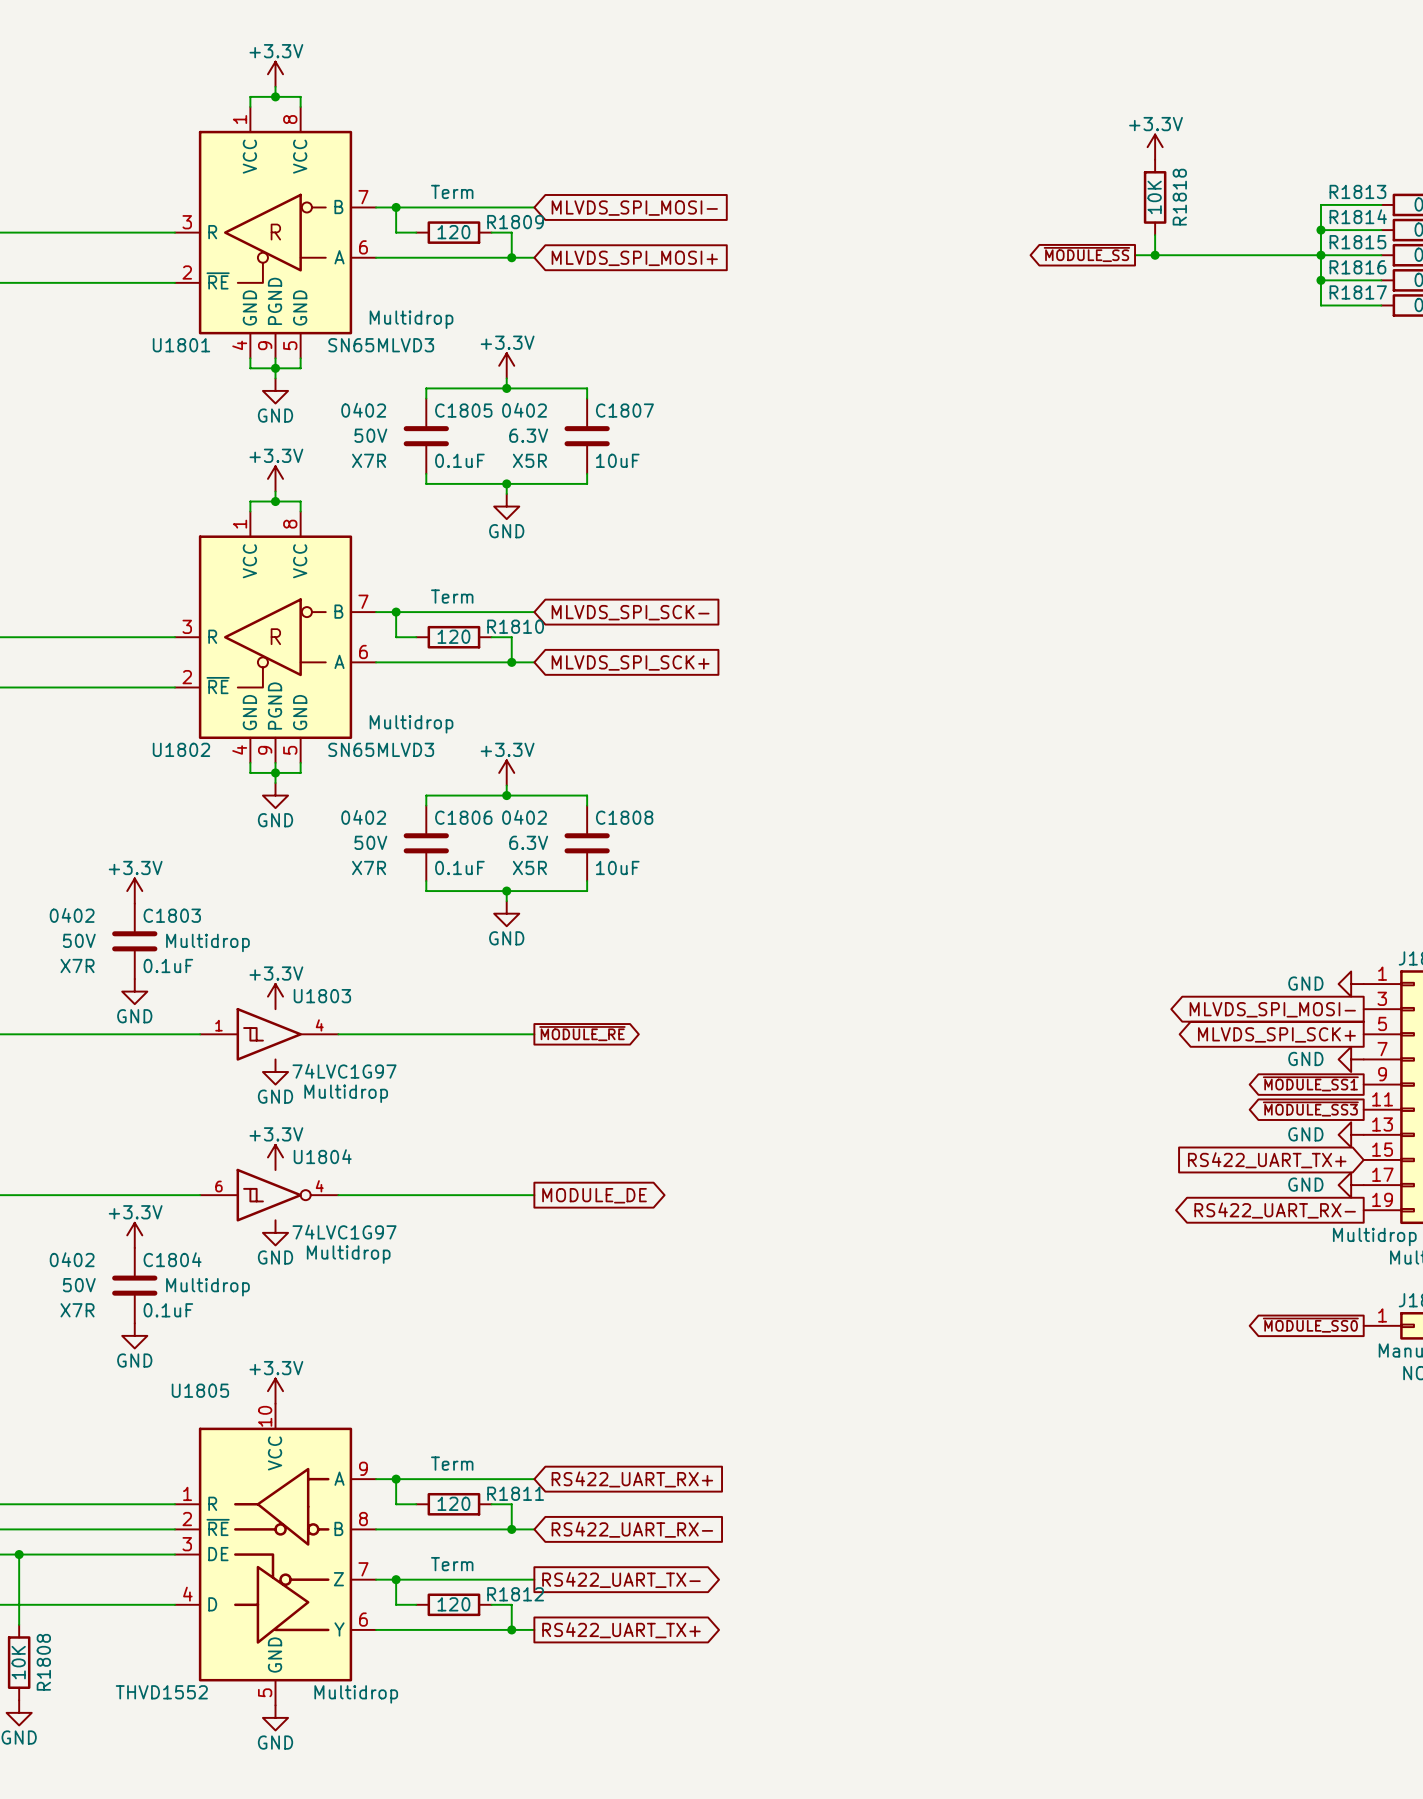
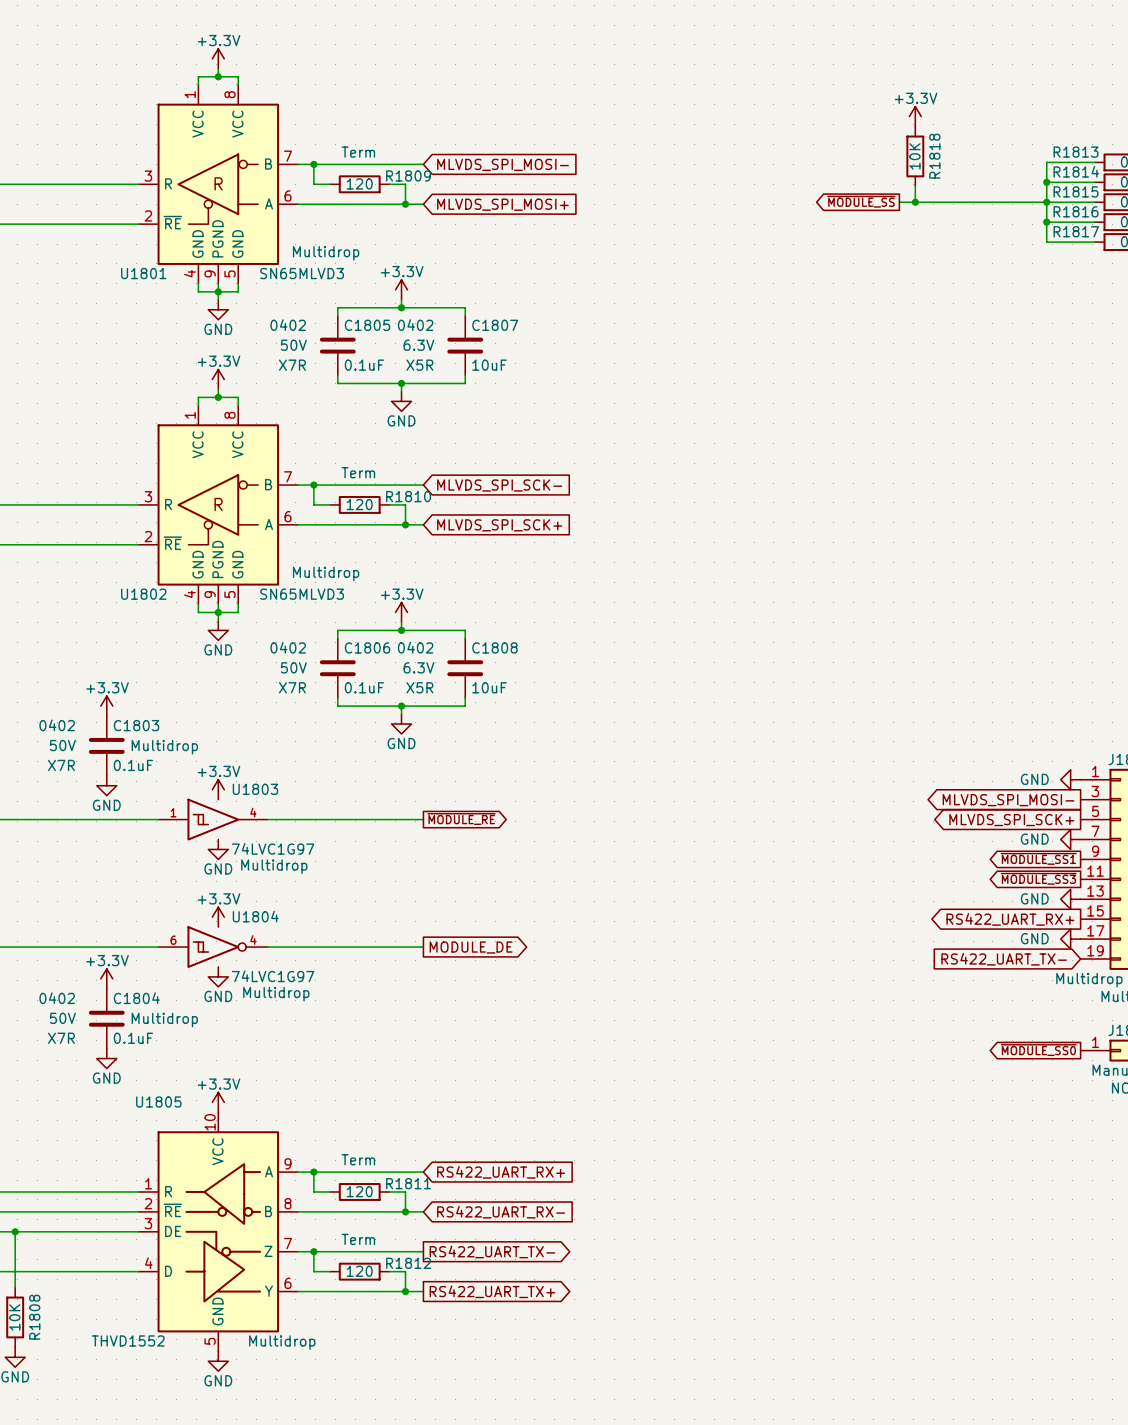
global label shape: input (1267, 1160) -> output (1010, 919)
global label: RS422_UART_TX+ (1267, 1160) -> RS422_UART_RX+ (1010, 919)
global label shape: output (1275, 1210) -> input (1004, 959)
global label: RS422_UART_RX- (1275, 1210) -> RS422_UART_TX- (1004, 959)

